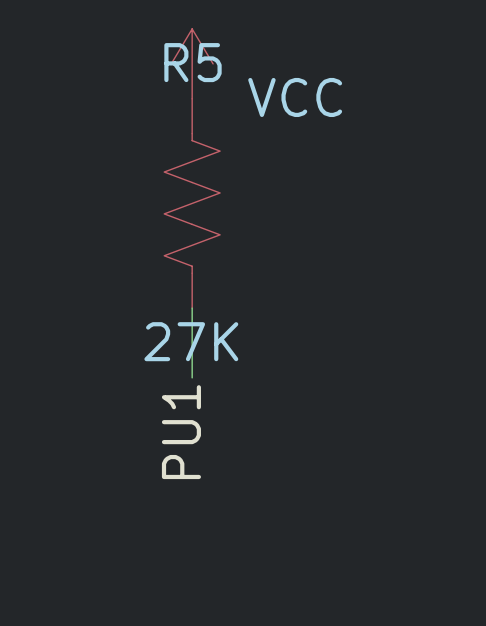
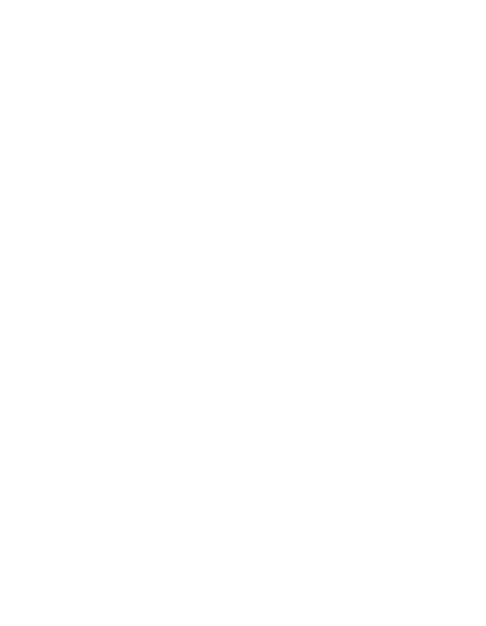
power symbol: VCC (192, 63) -> none
R5: 27K (192, 203) -> none
wire: (192, 308) (192, 377) -> none
label: PU1 (181, 432) -> none

